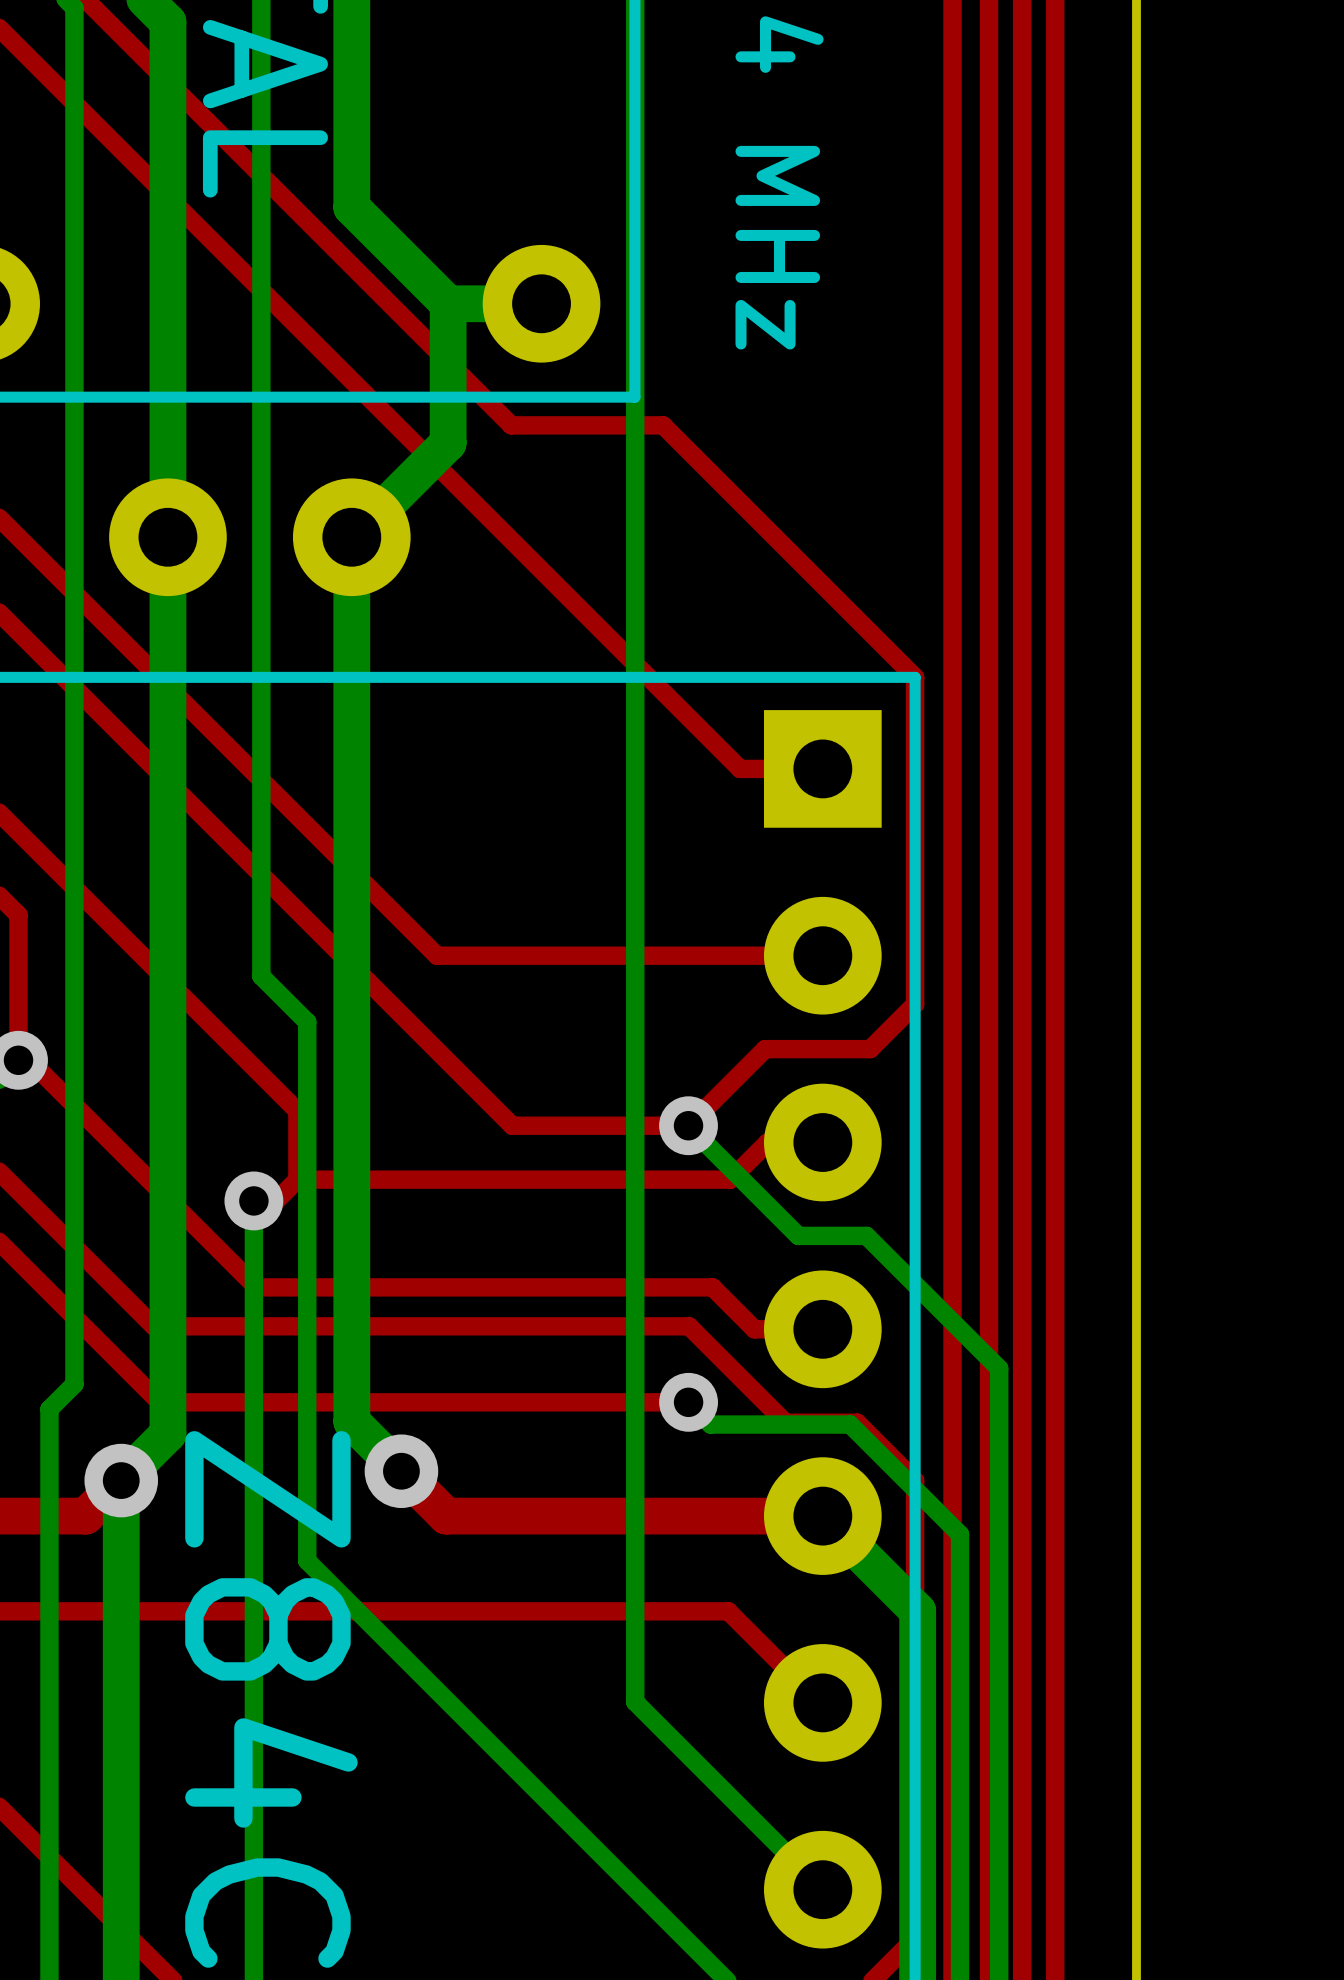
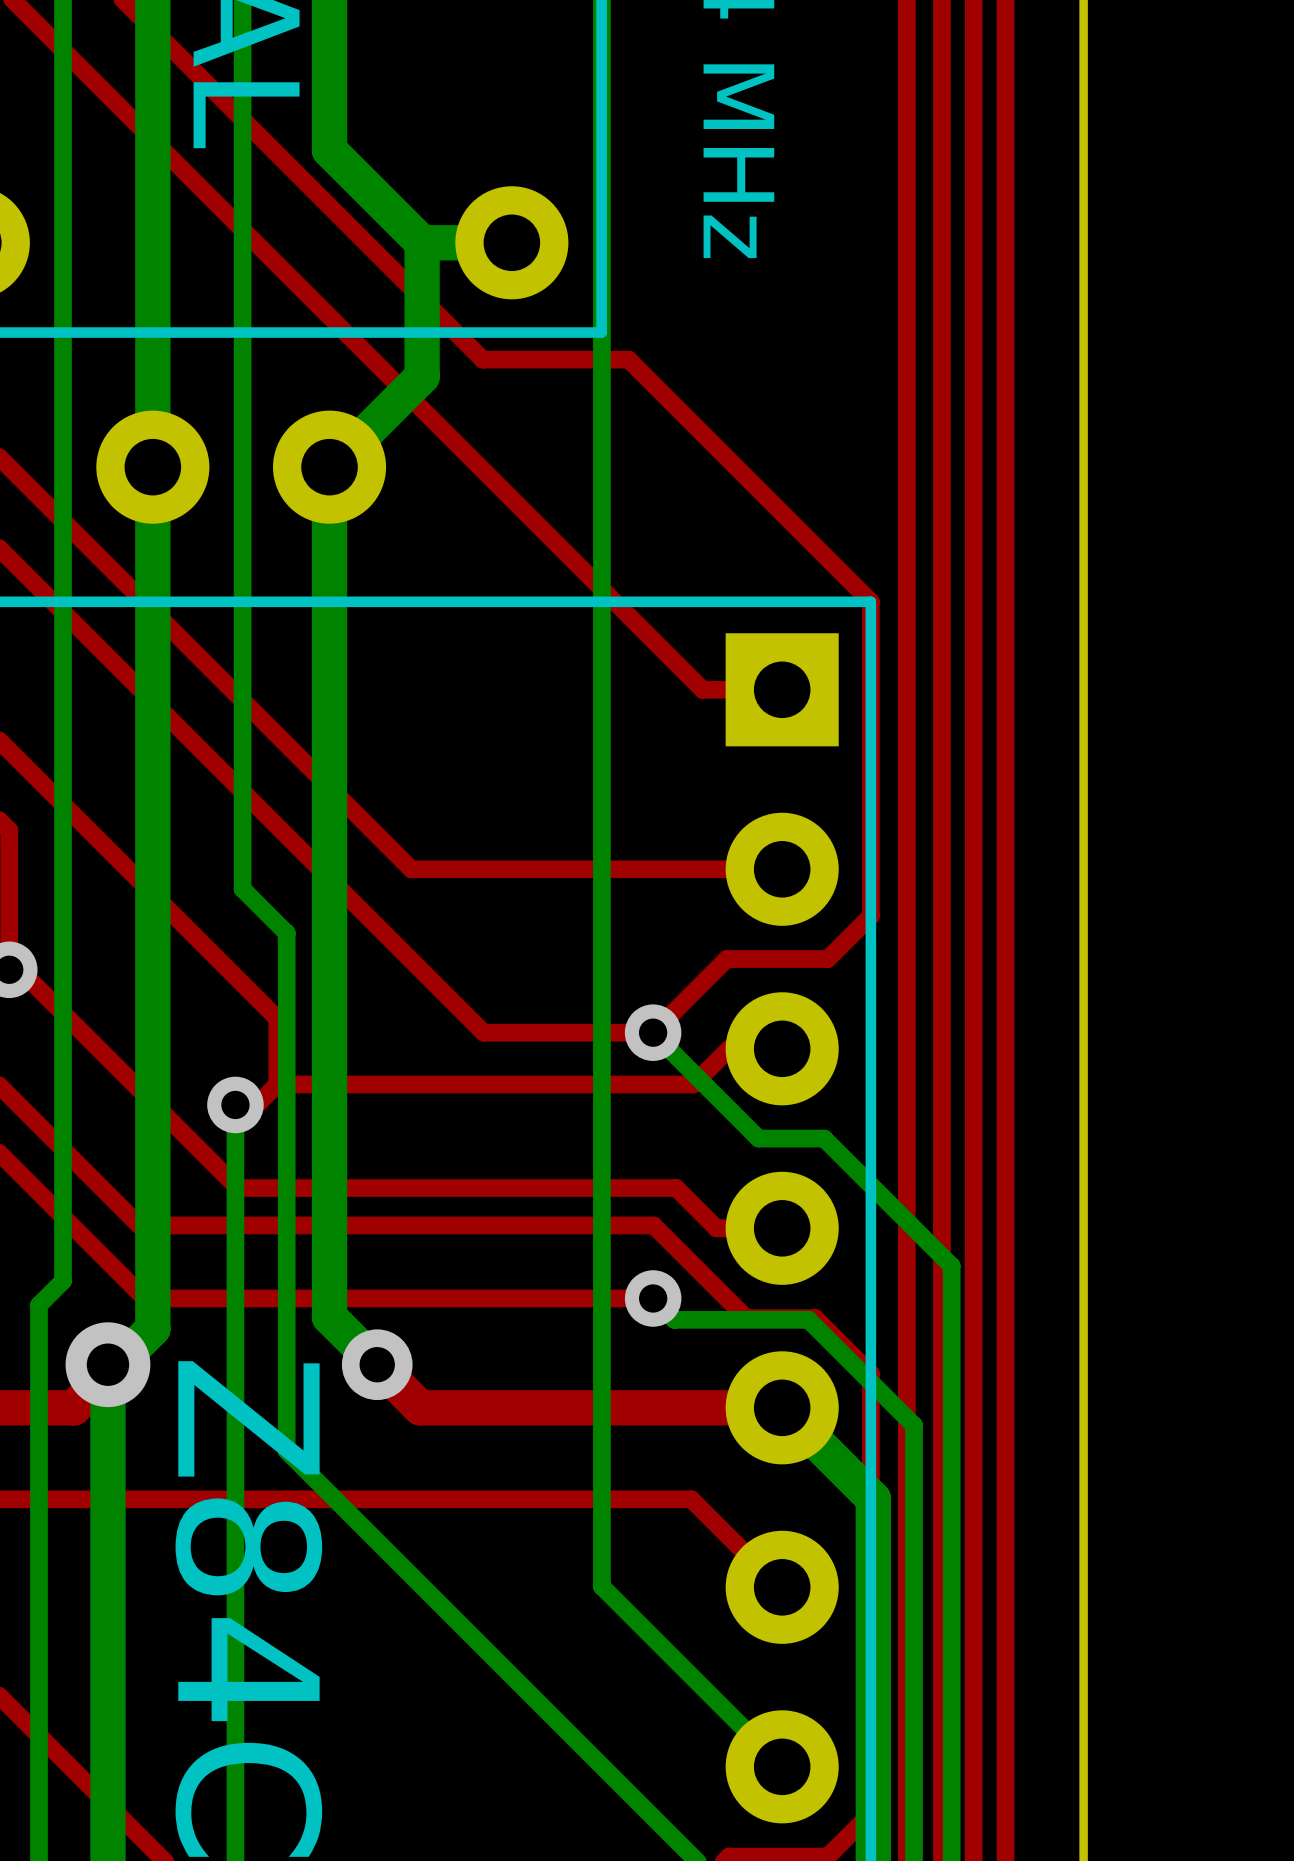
via size: [84, 1443, 159, 1518] -> [65, 1322, 151, 1408]

